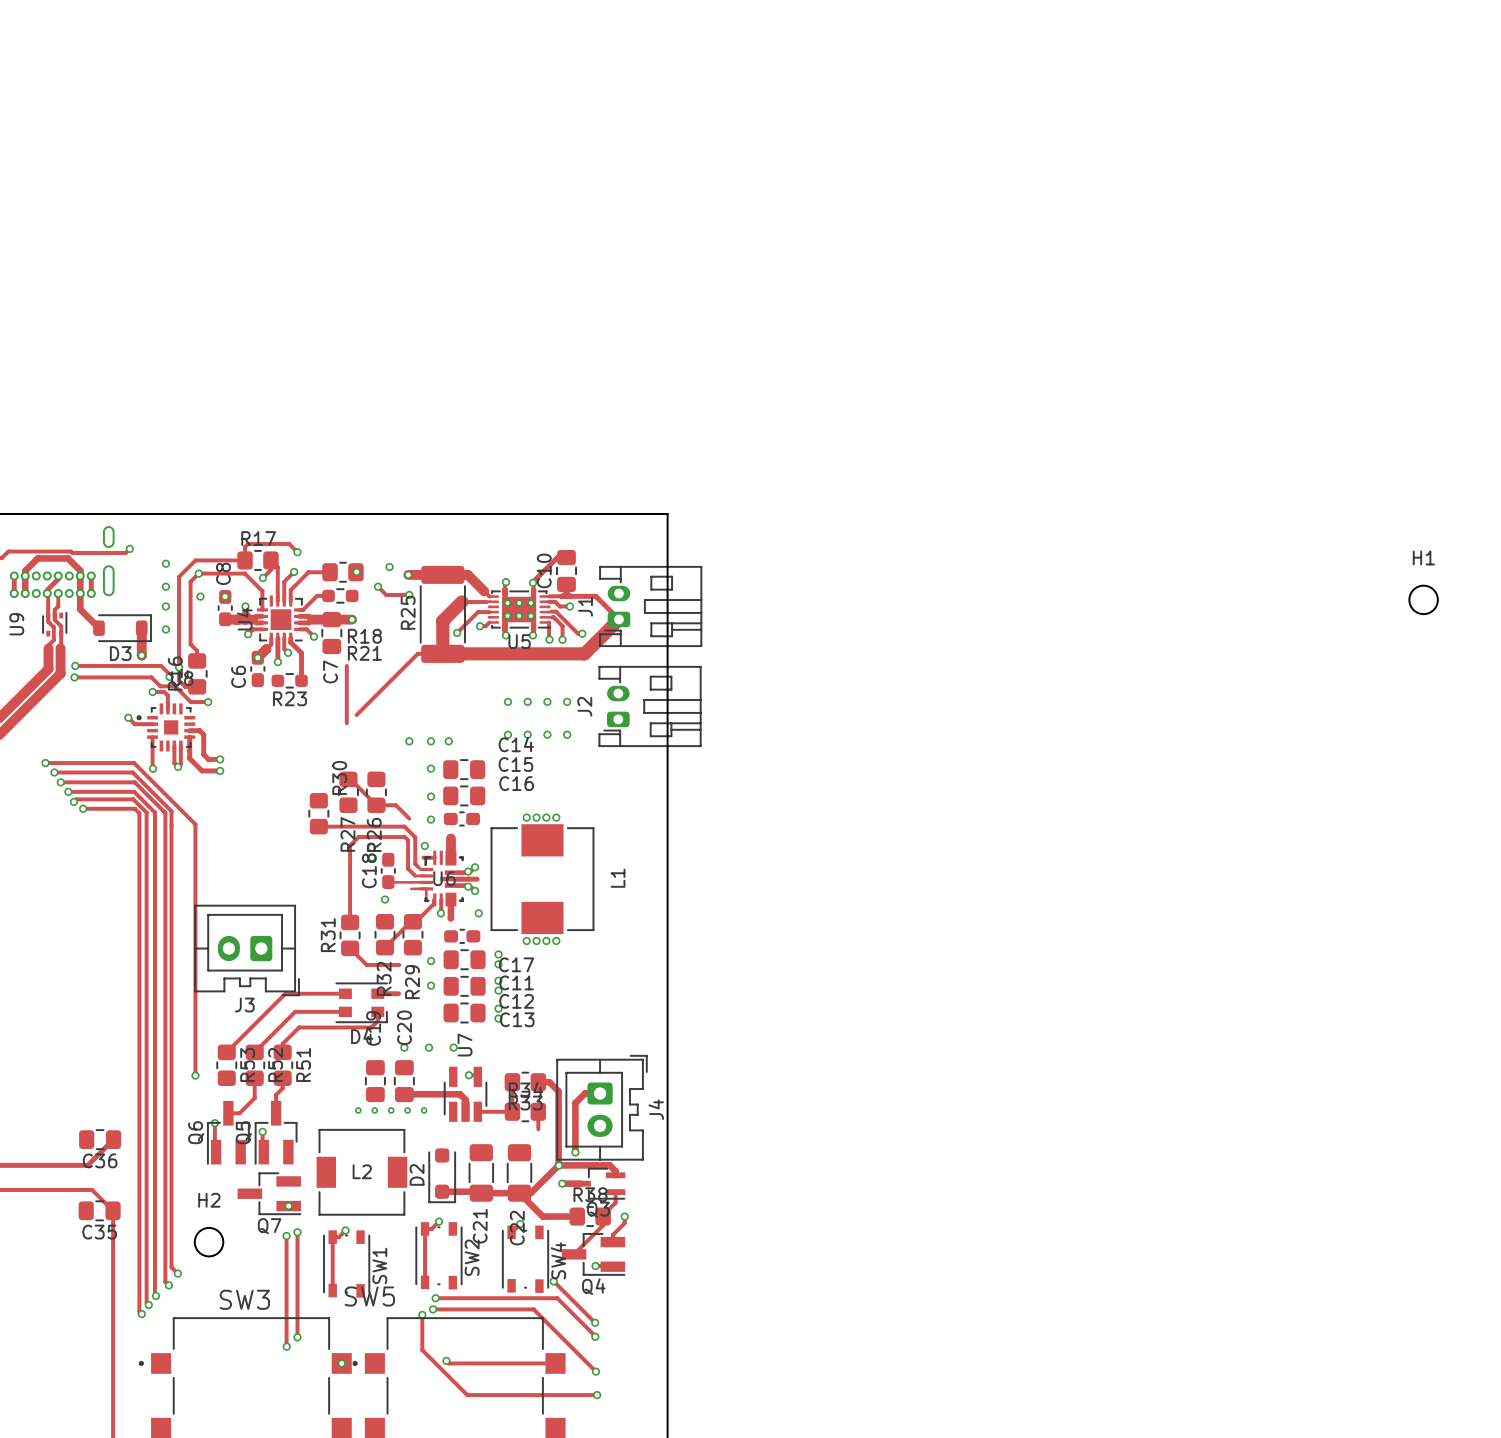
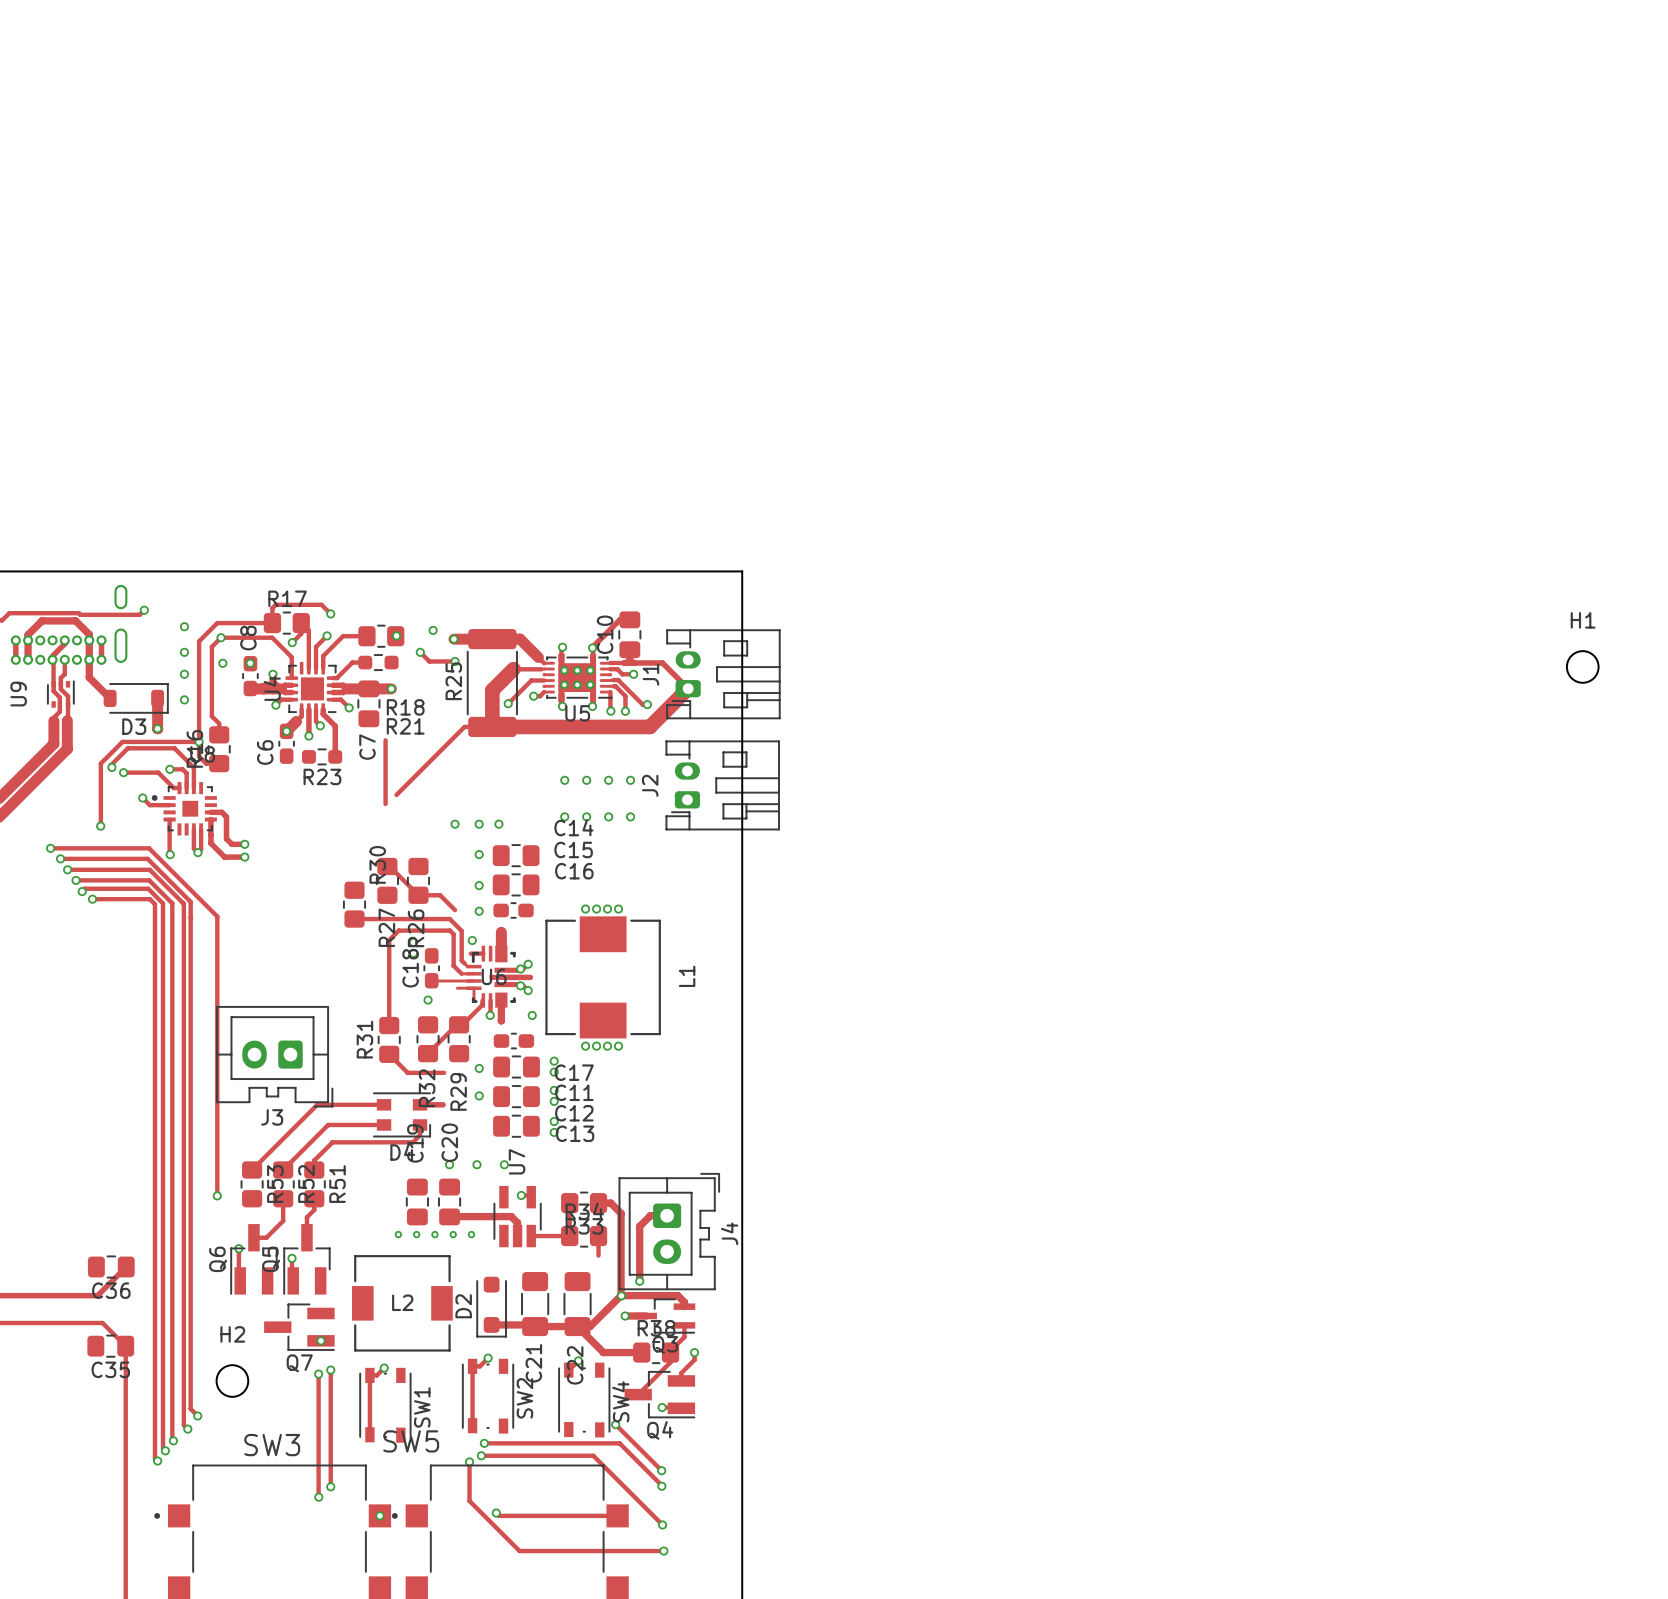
track: (75, 665) (161, 665) (169, 674) (169, 676) -> none
via: (75, 665) -> none
track: none -> (199, 741) (122, 741) (100, 763) (100, 826)
via: (169, 676) -> none
track: (74, 677) (151, 677) (160, 686) (175, 686) (190, 702) (208, 702) -> none
via: (74, 677) -> none
track: none -> (111, 766) (127, 748) (174, 748) (193, 767) (193, 788)
via: none -> (111, 767)
track: none -> (123, 772) (158, 772) (173, 788) (179, 788)
via: none -> (123, 772)
via: (208, 702) -> none
via: none -> (100, 826)

